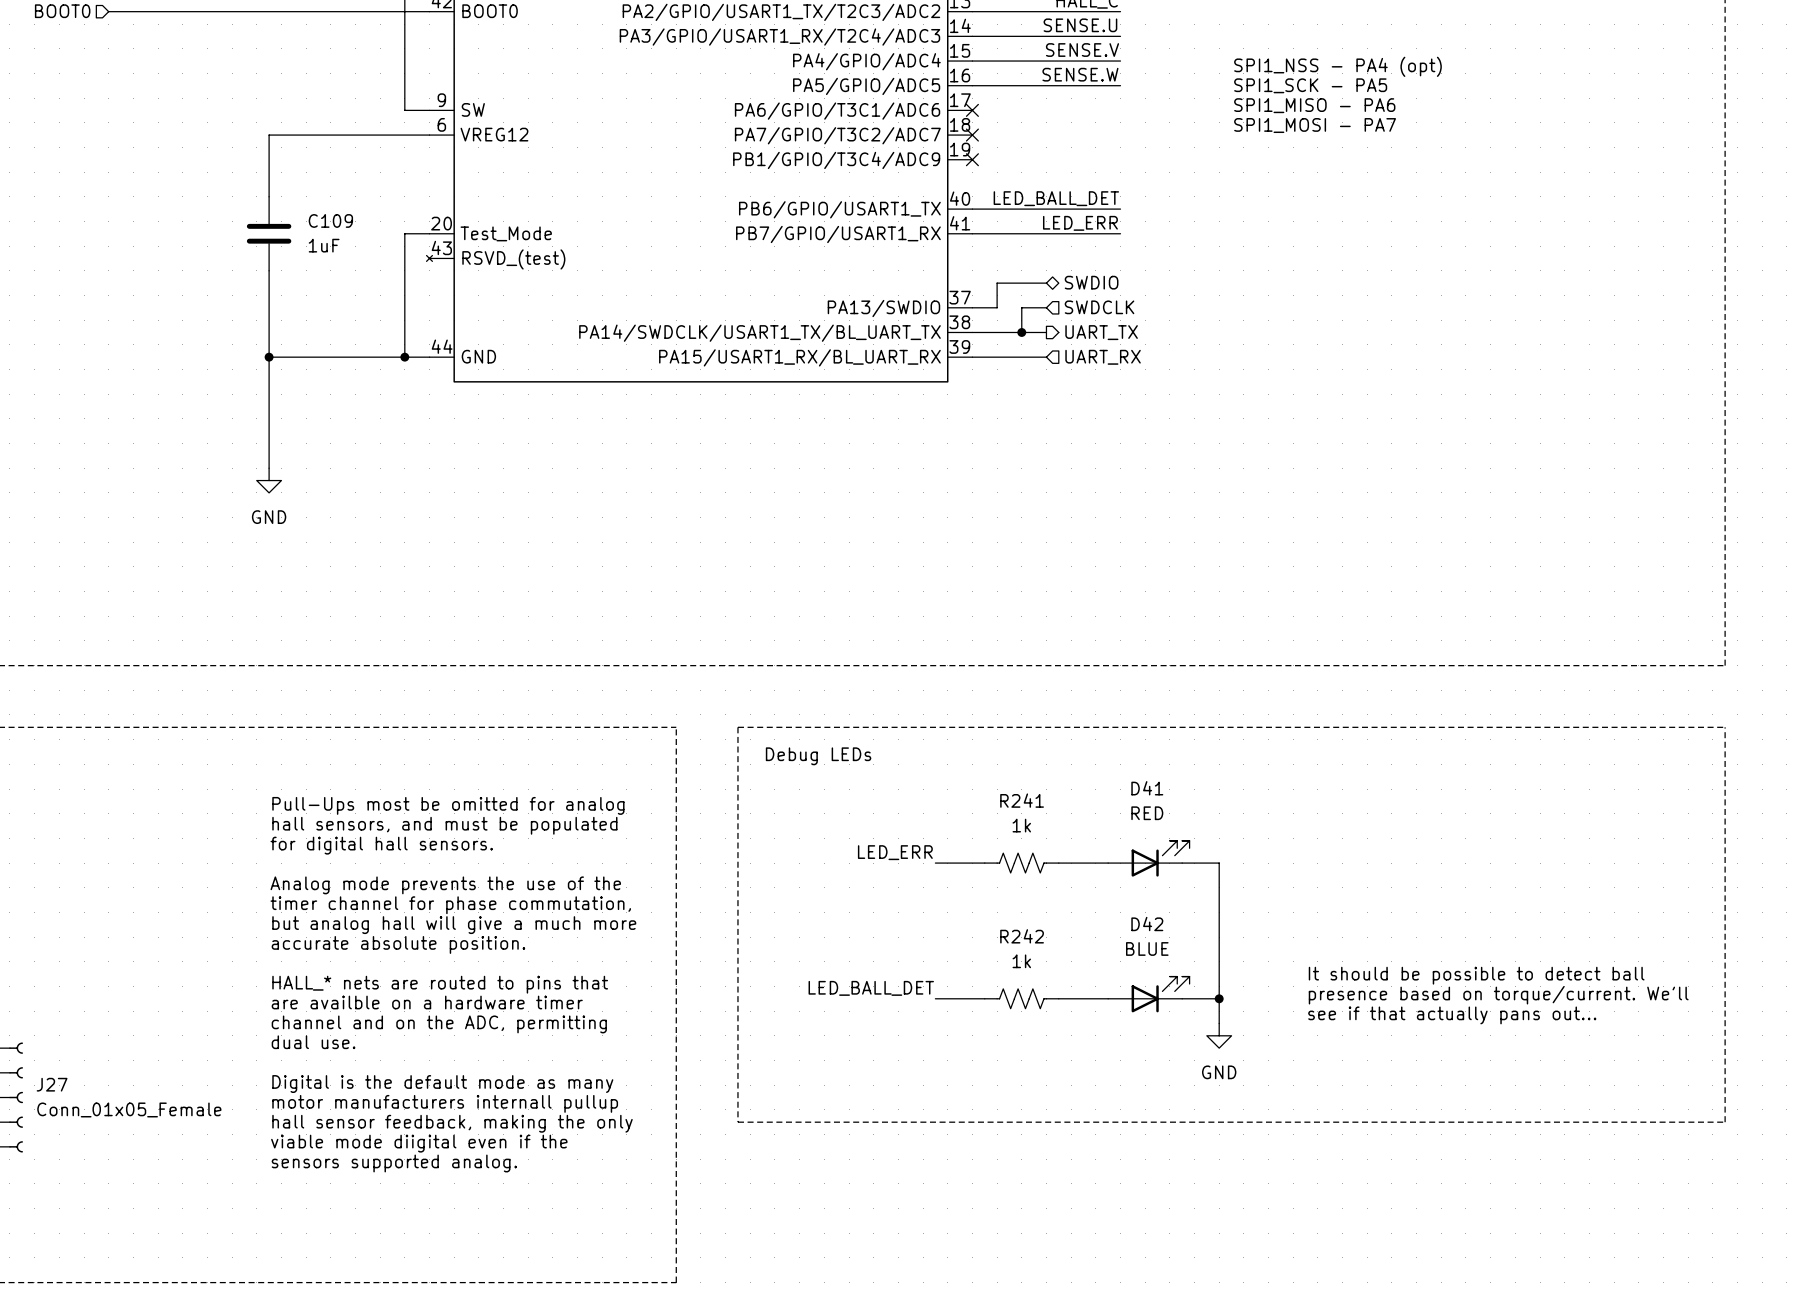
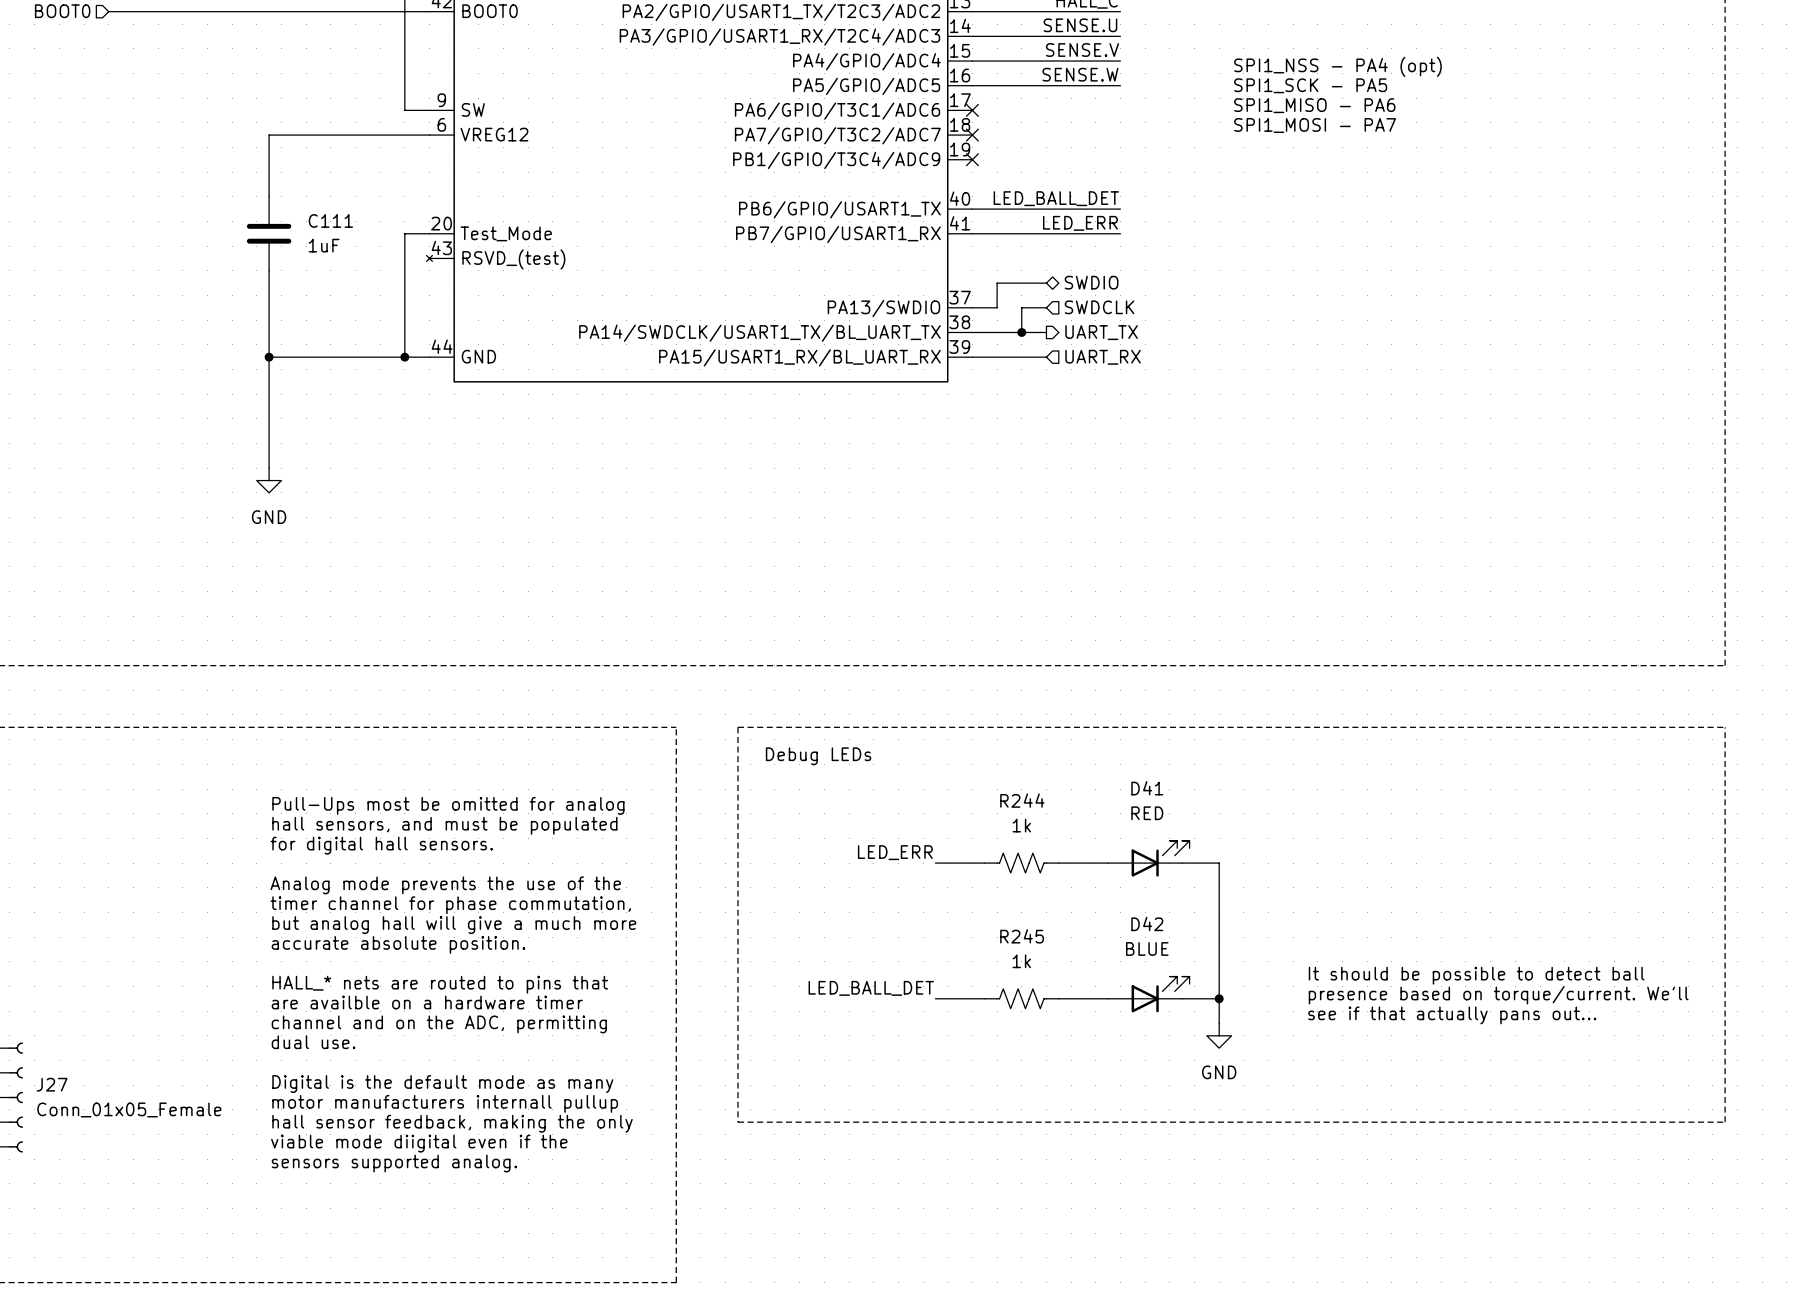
C109 name: C109 (330, 220) -> C111 (330, 220)
R241 name: R241 (1022, 800) -> R244 (1022, 800)
R242 name: R242 (1022, 936) -> R245 (1022, 936)

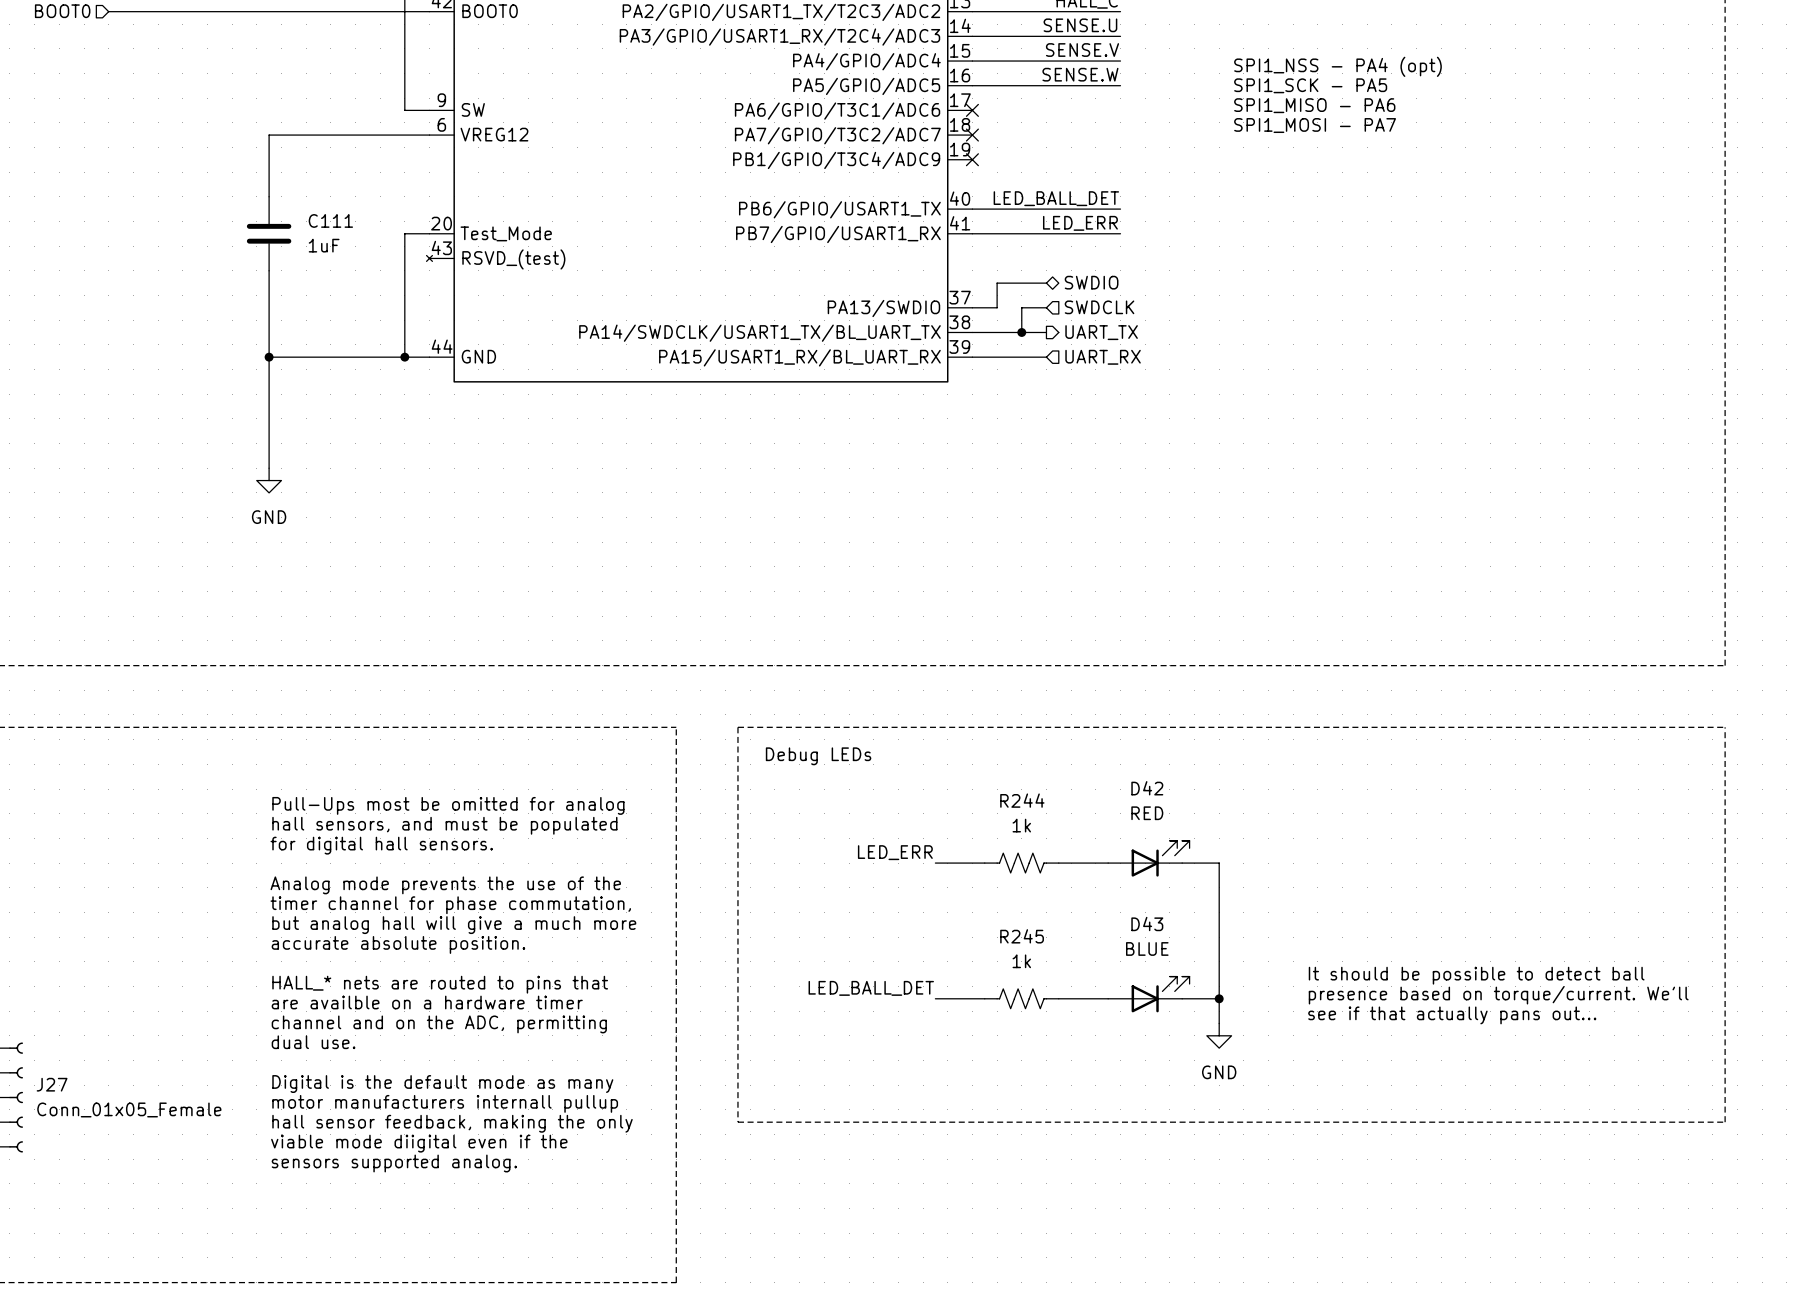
D41 name: D41 (1147, 788) -> D42 (1147, 788)
D42 name: D42 (1147, 924) -> D43 (1147, 924)

